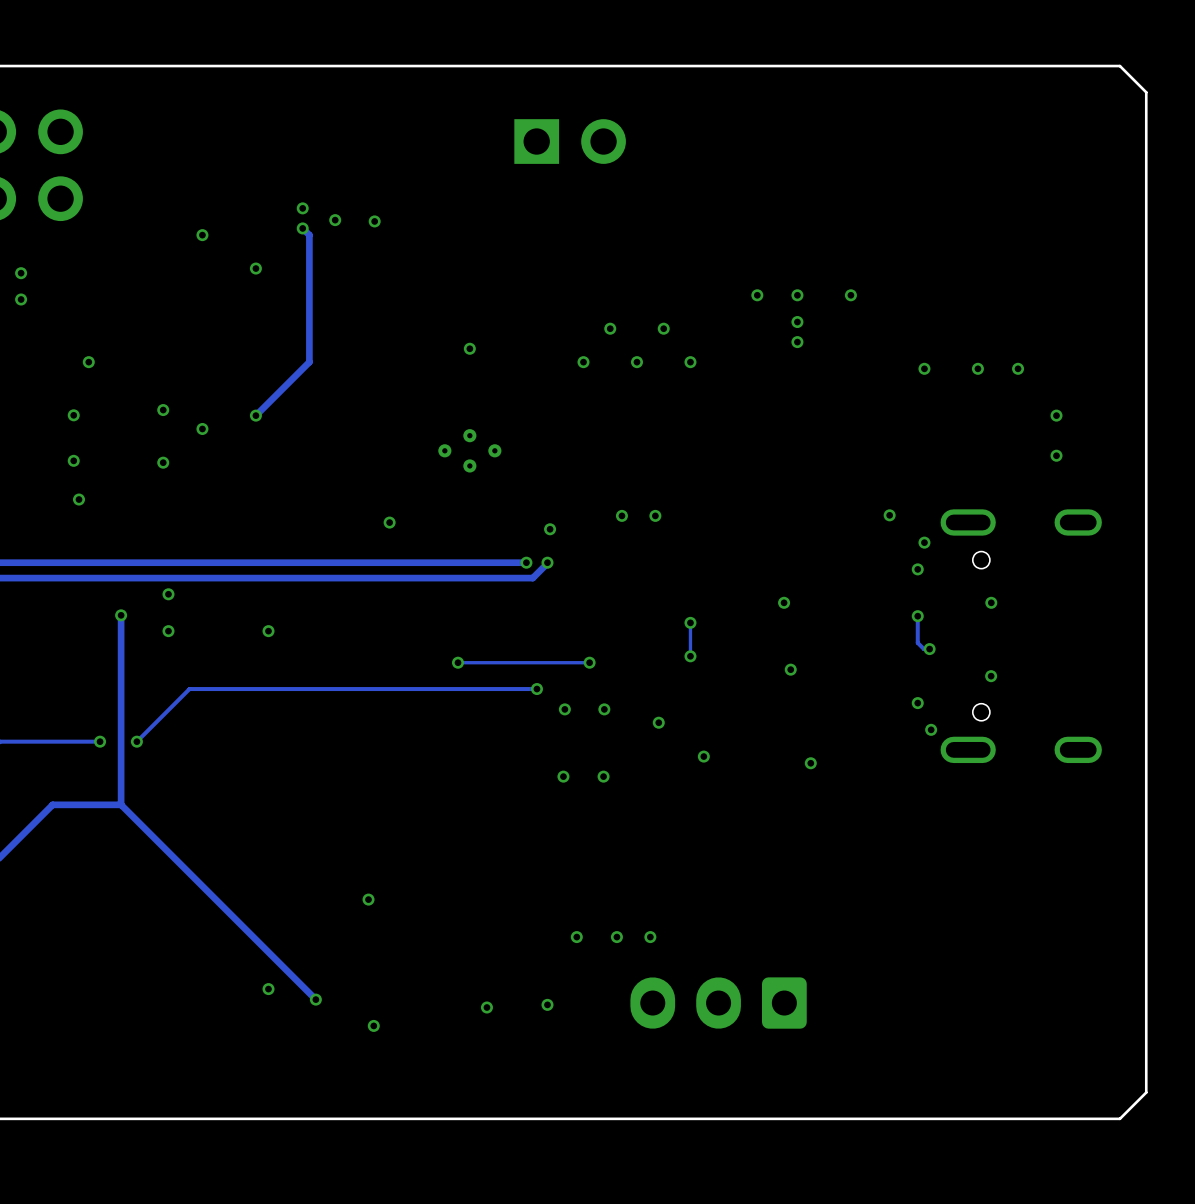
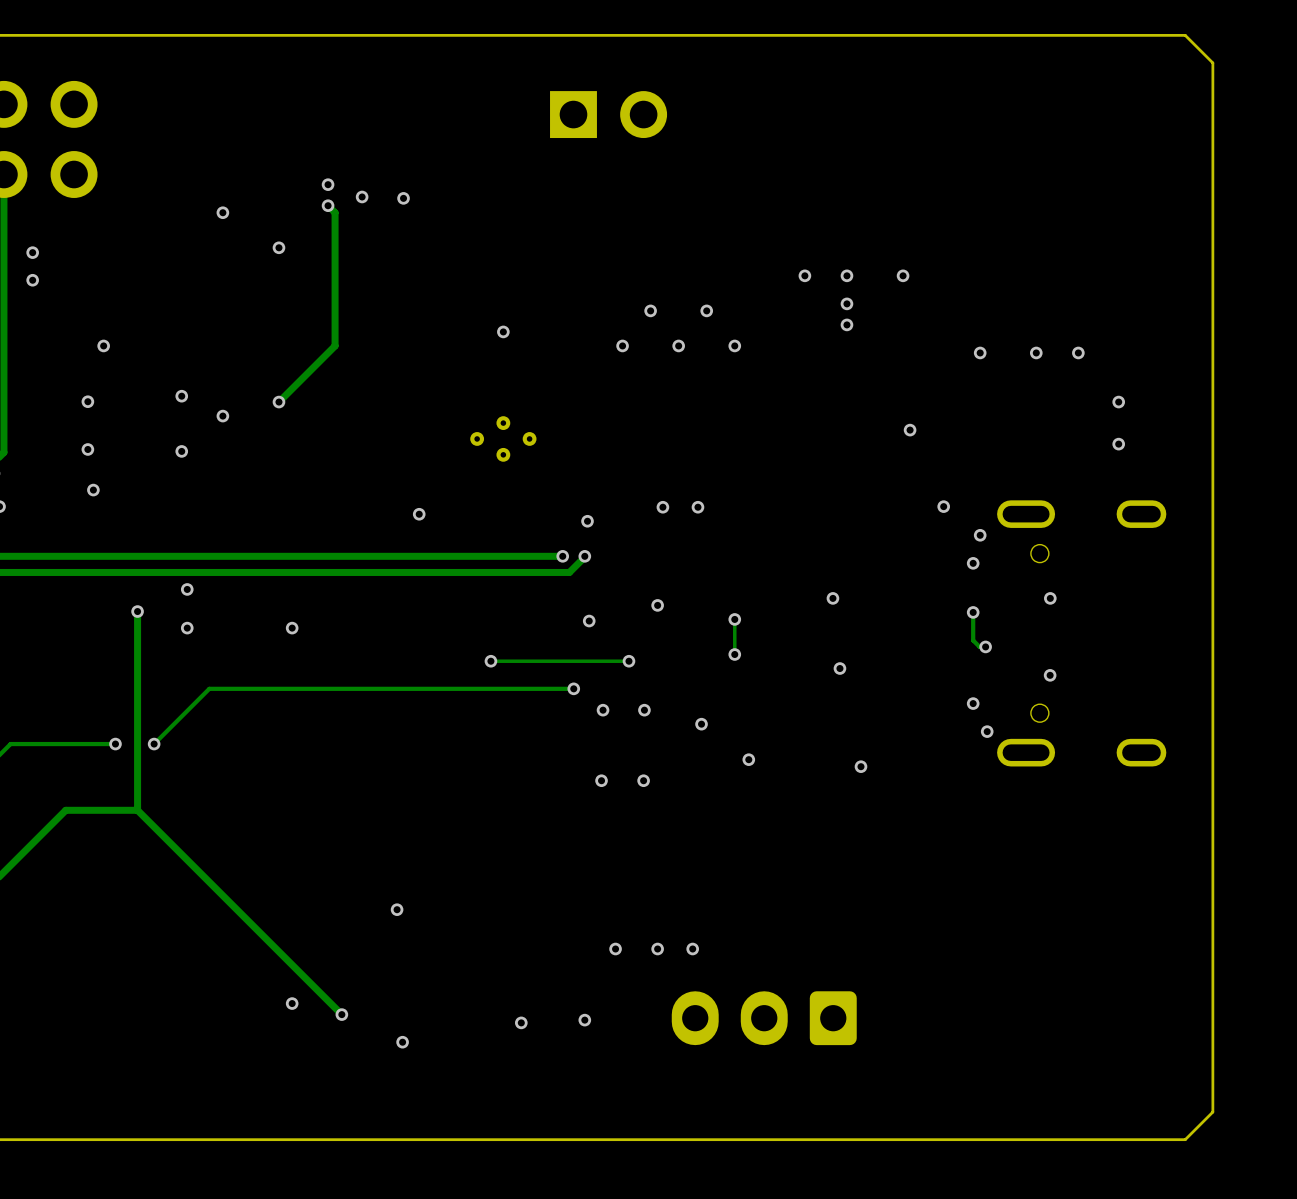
via: none -> (910, 430)
via: none -> (657, 605)
via: none -> (589, 621)

